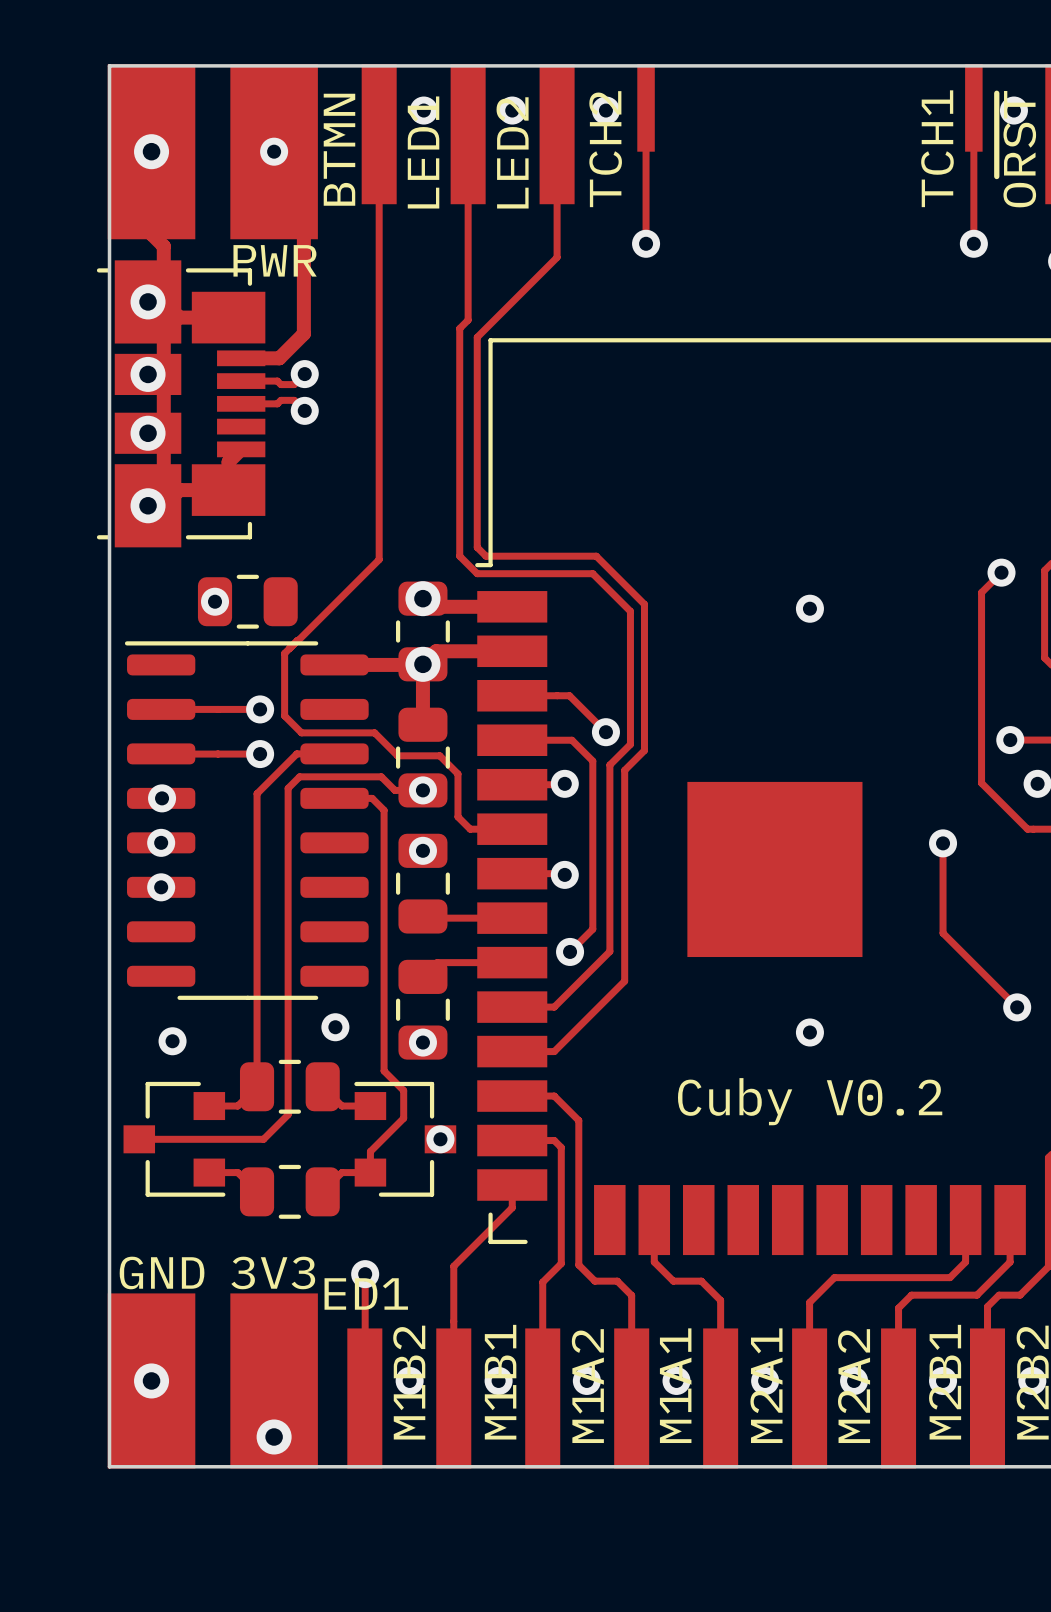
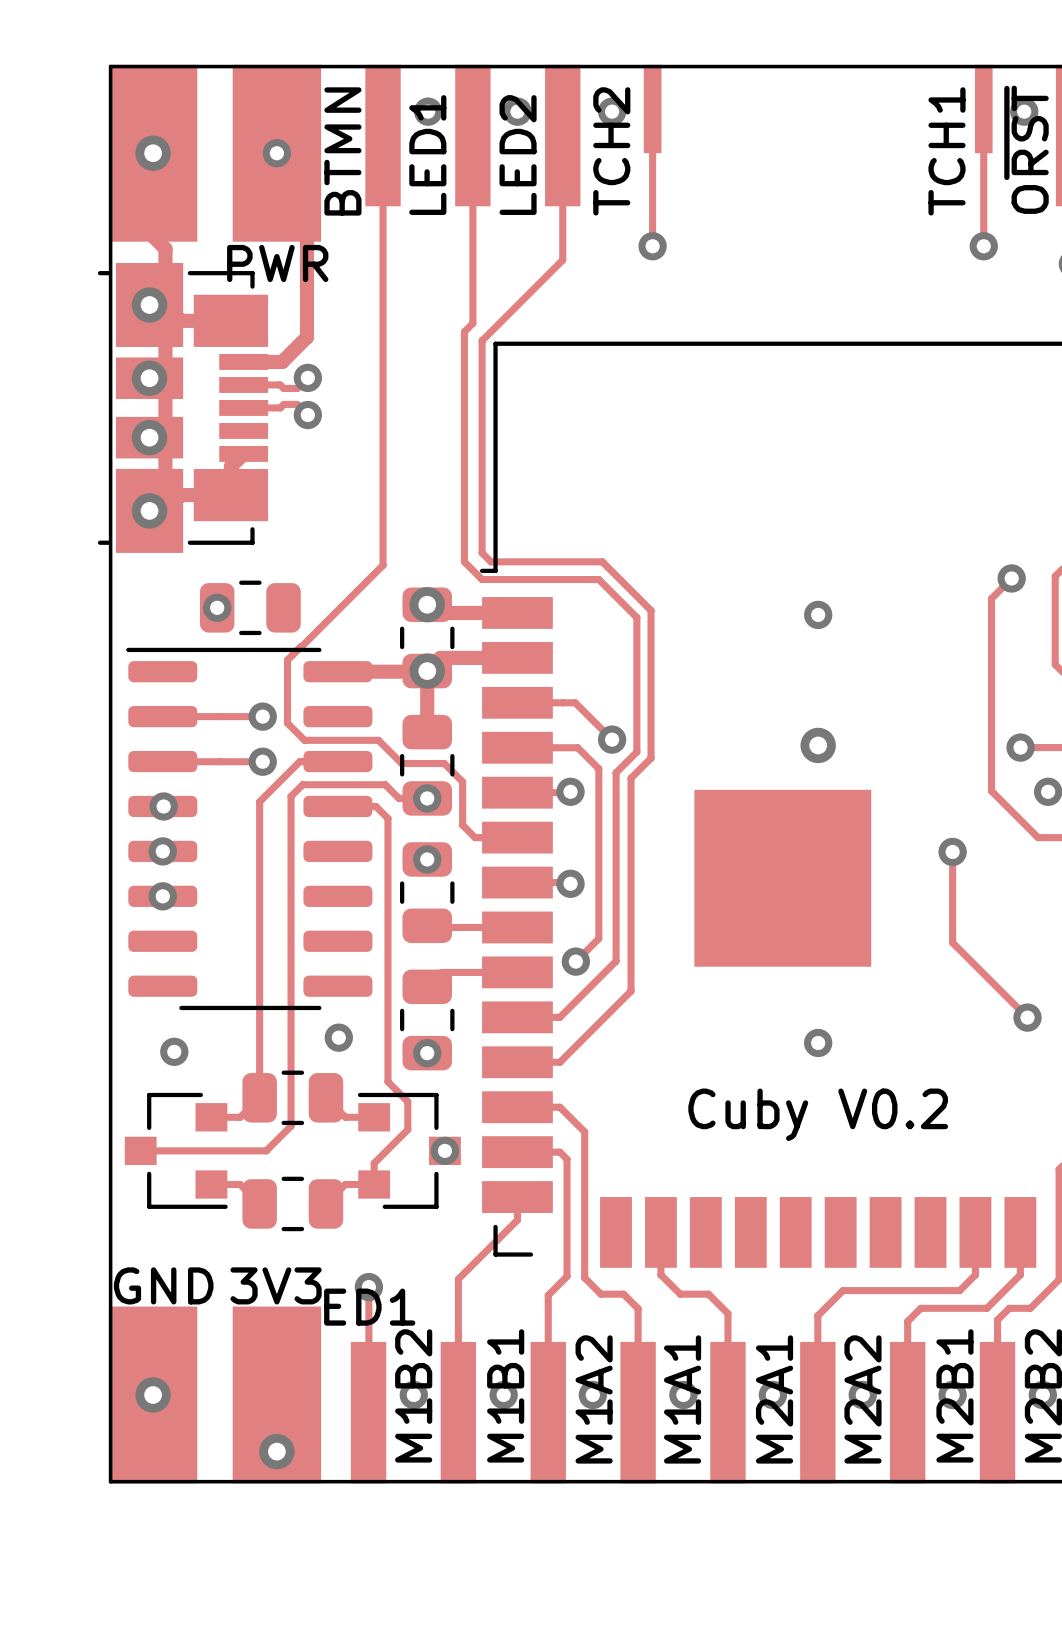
via: none -> (818, 745)

